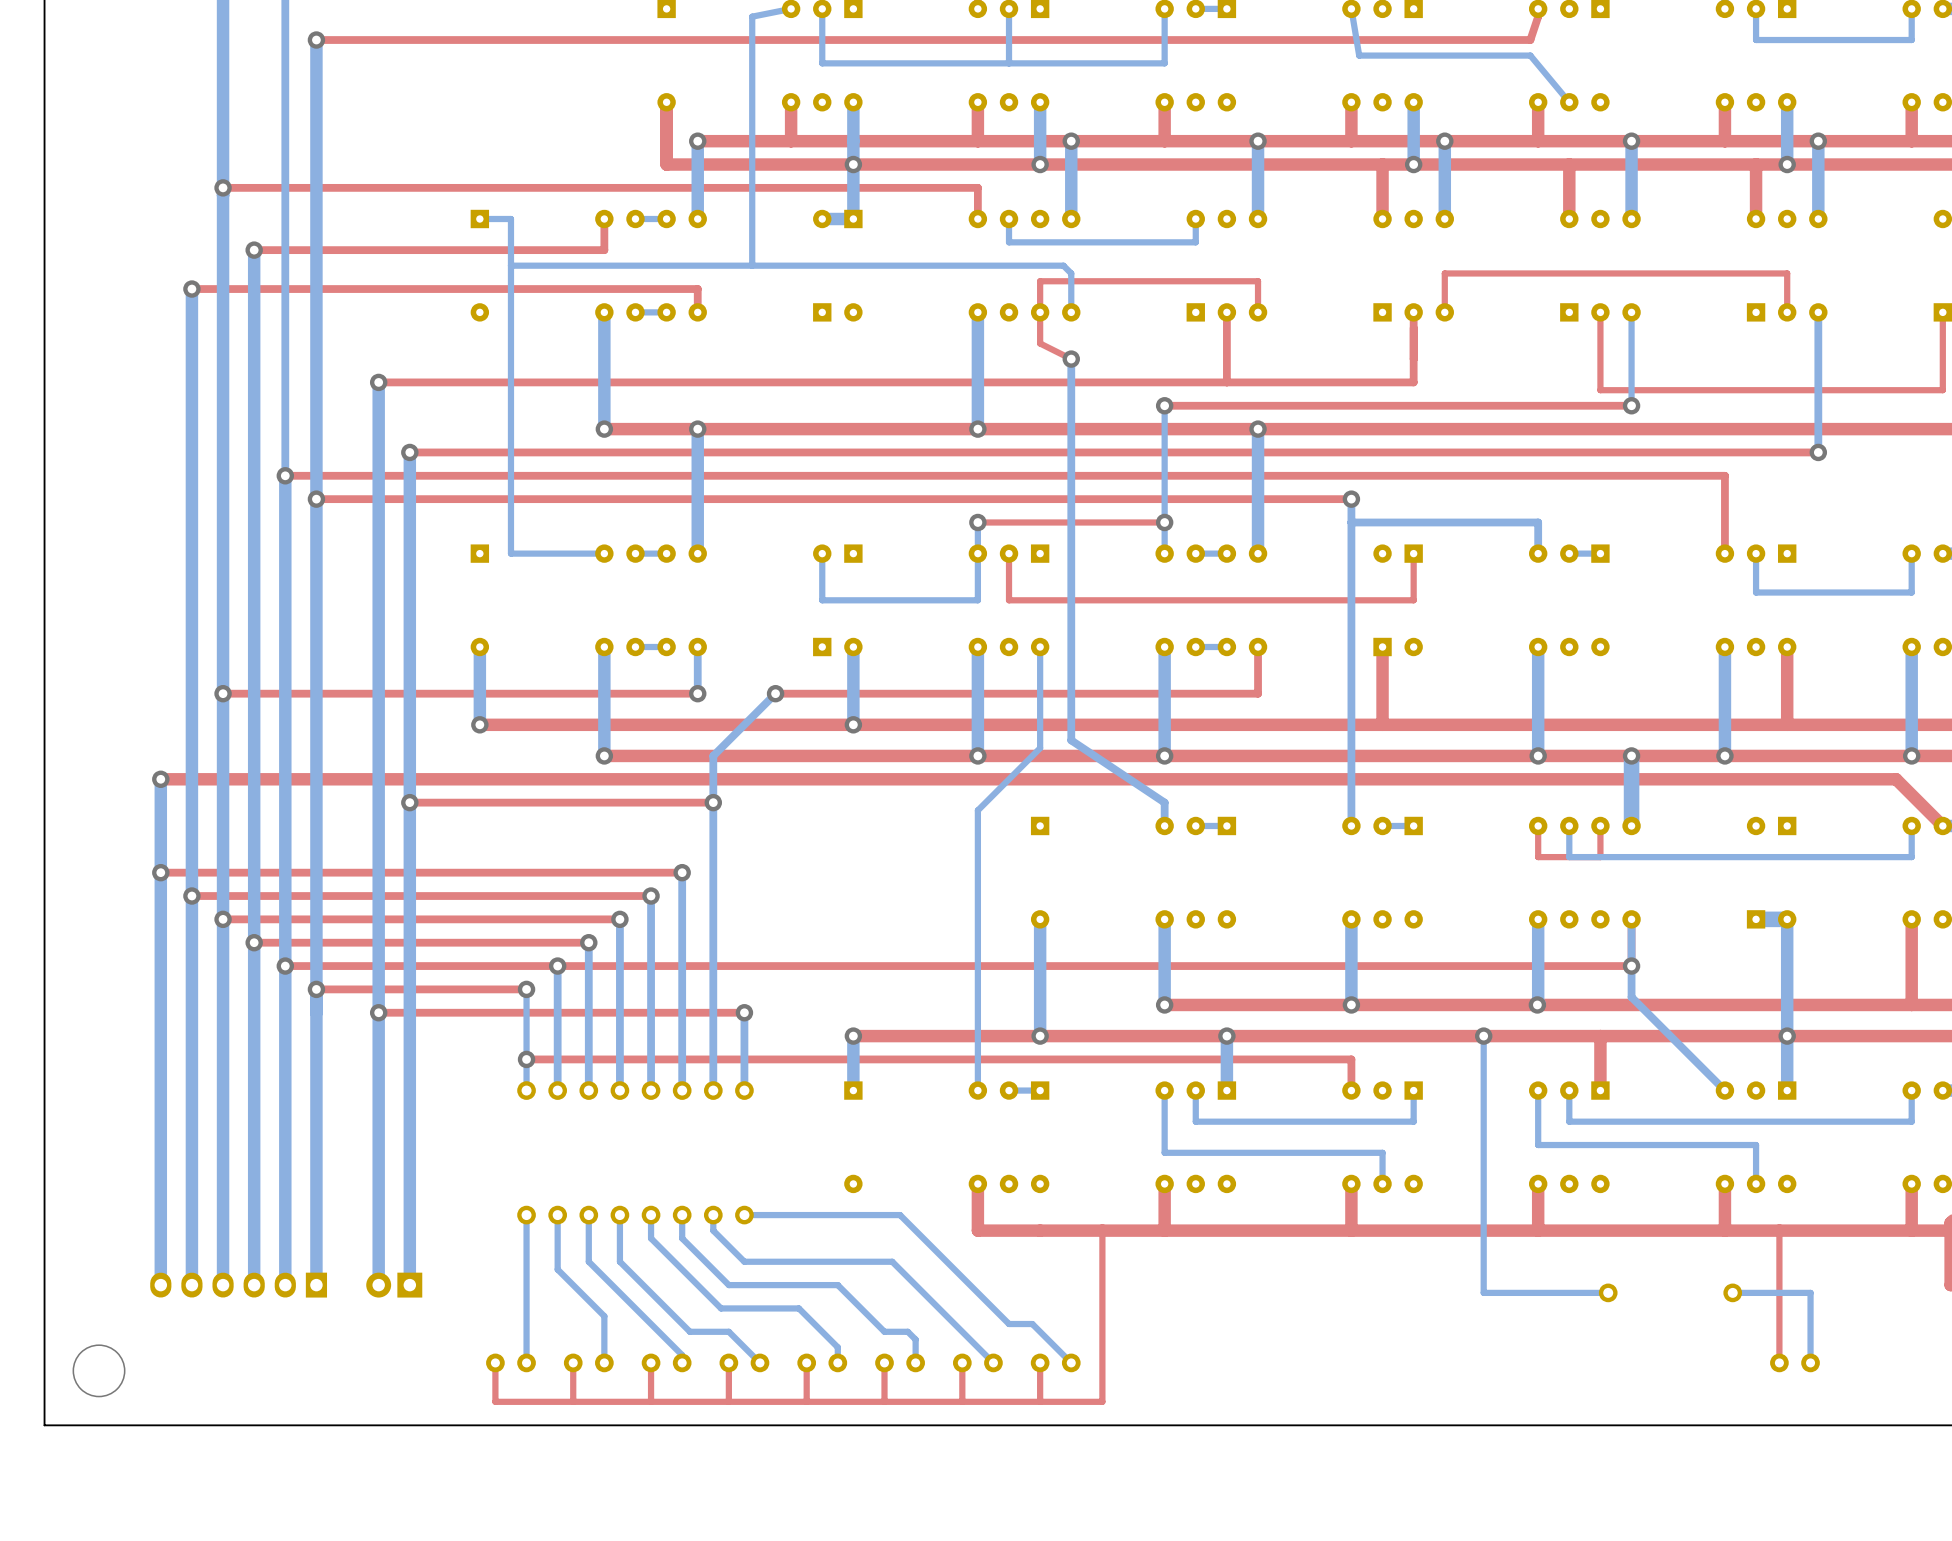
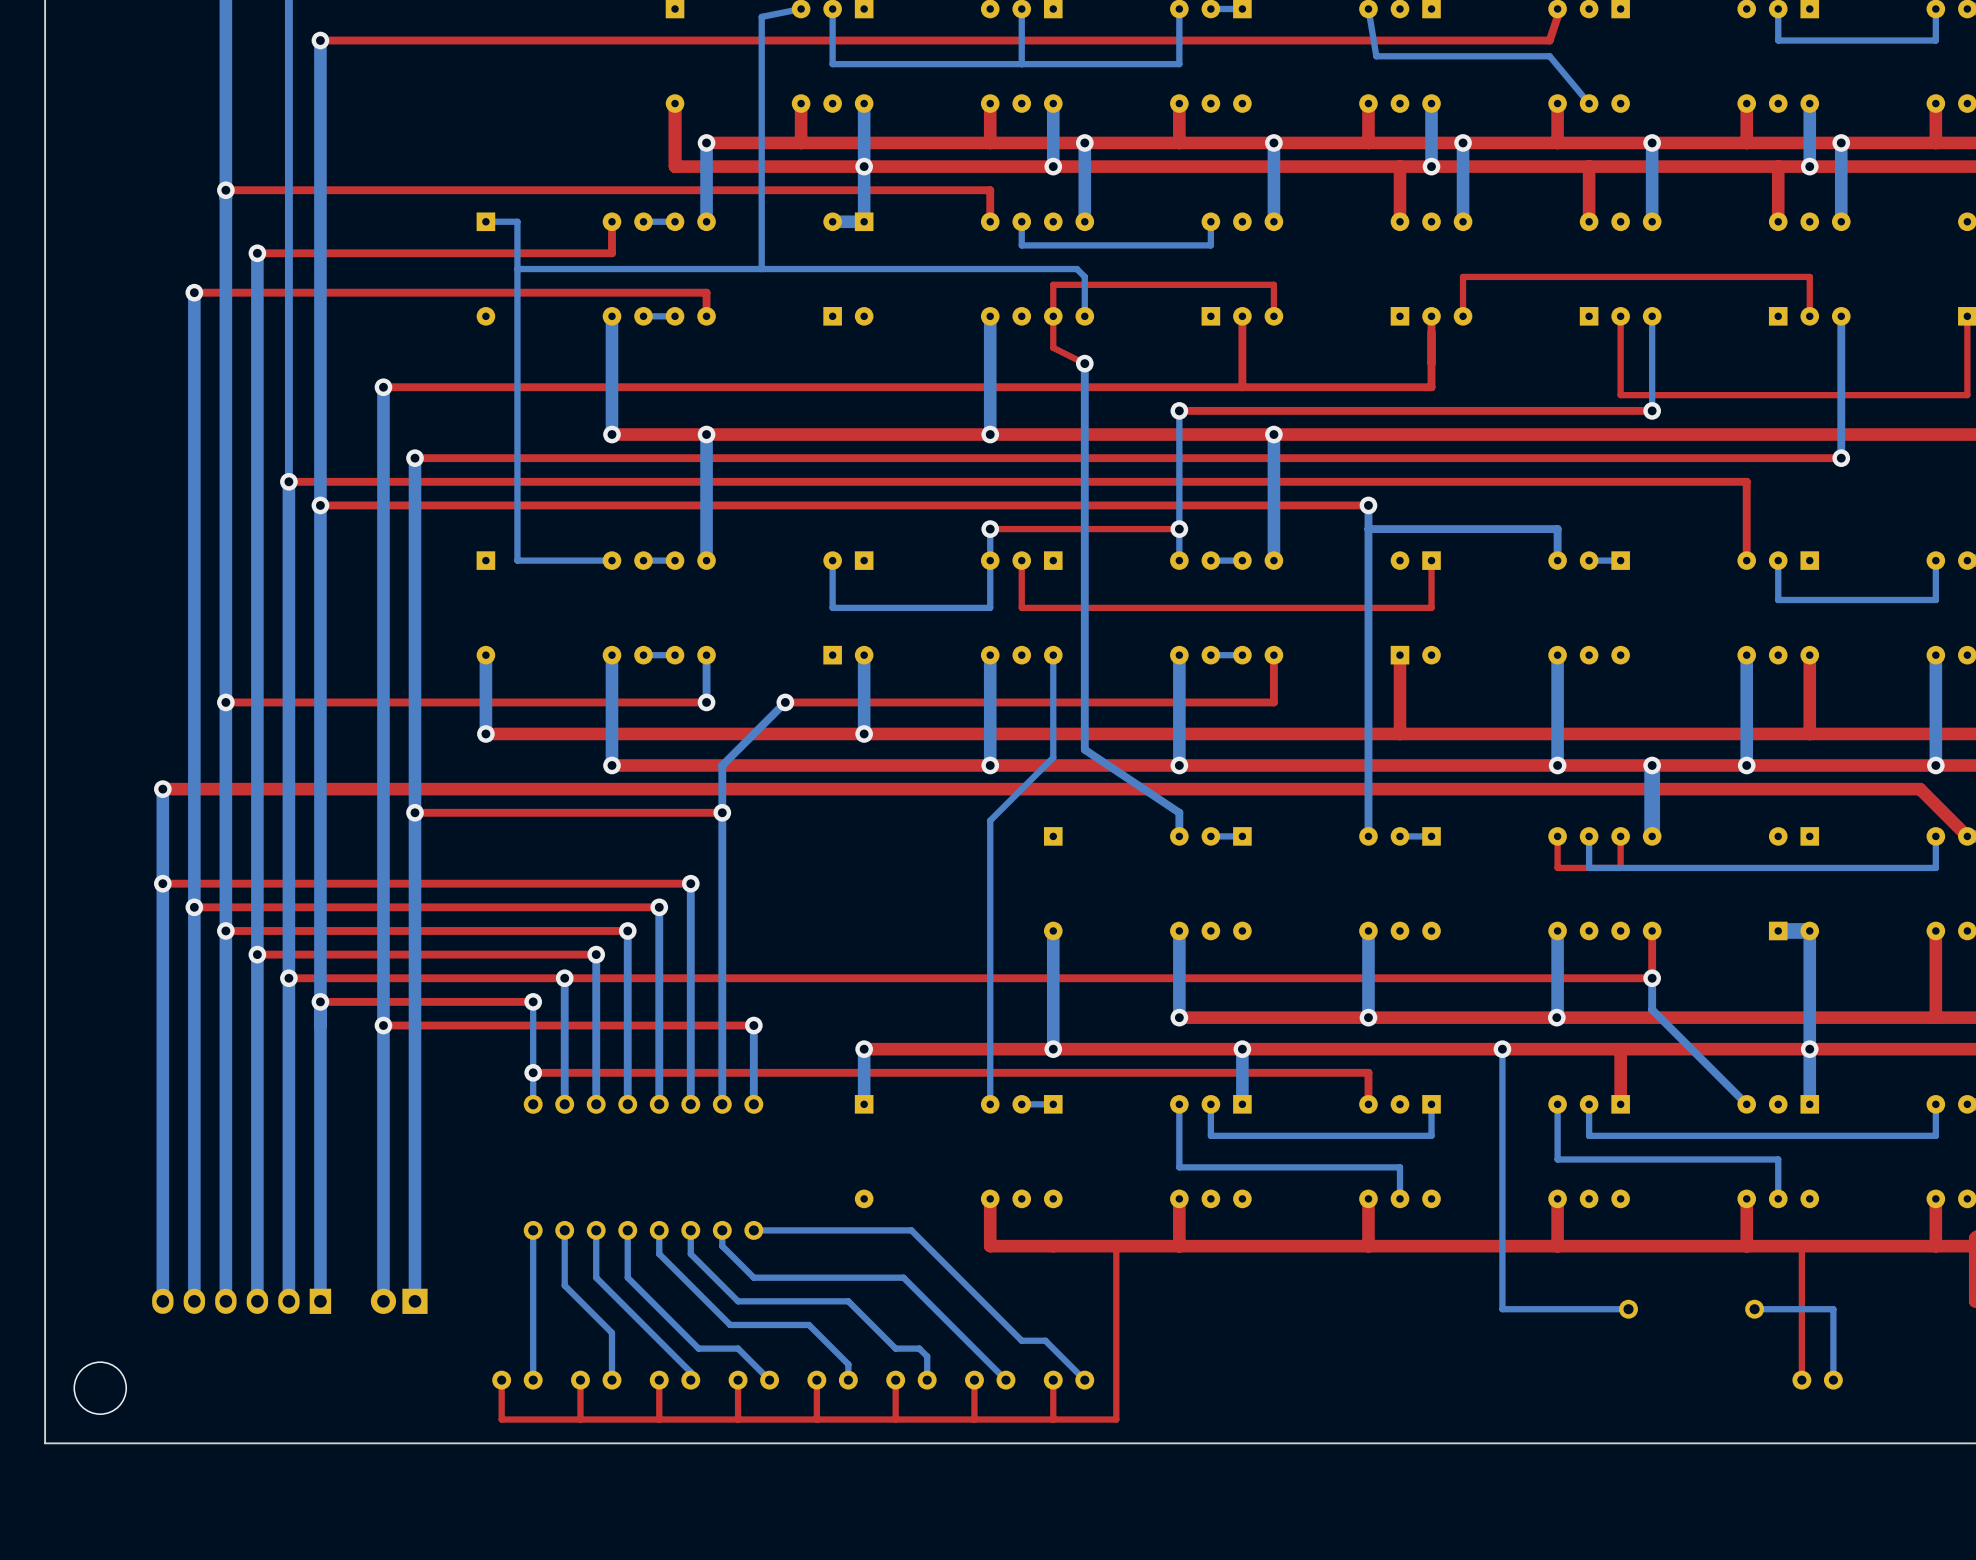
bottom track: (1631, 919) (1631, 966) -> none

